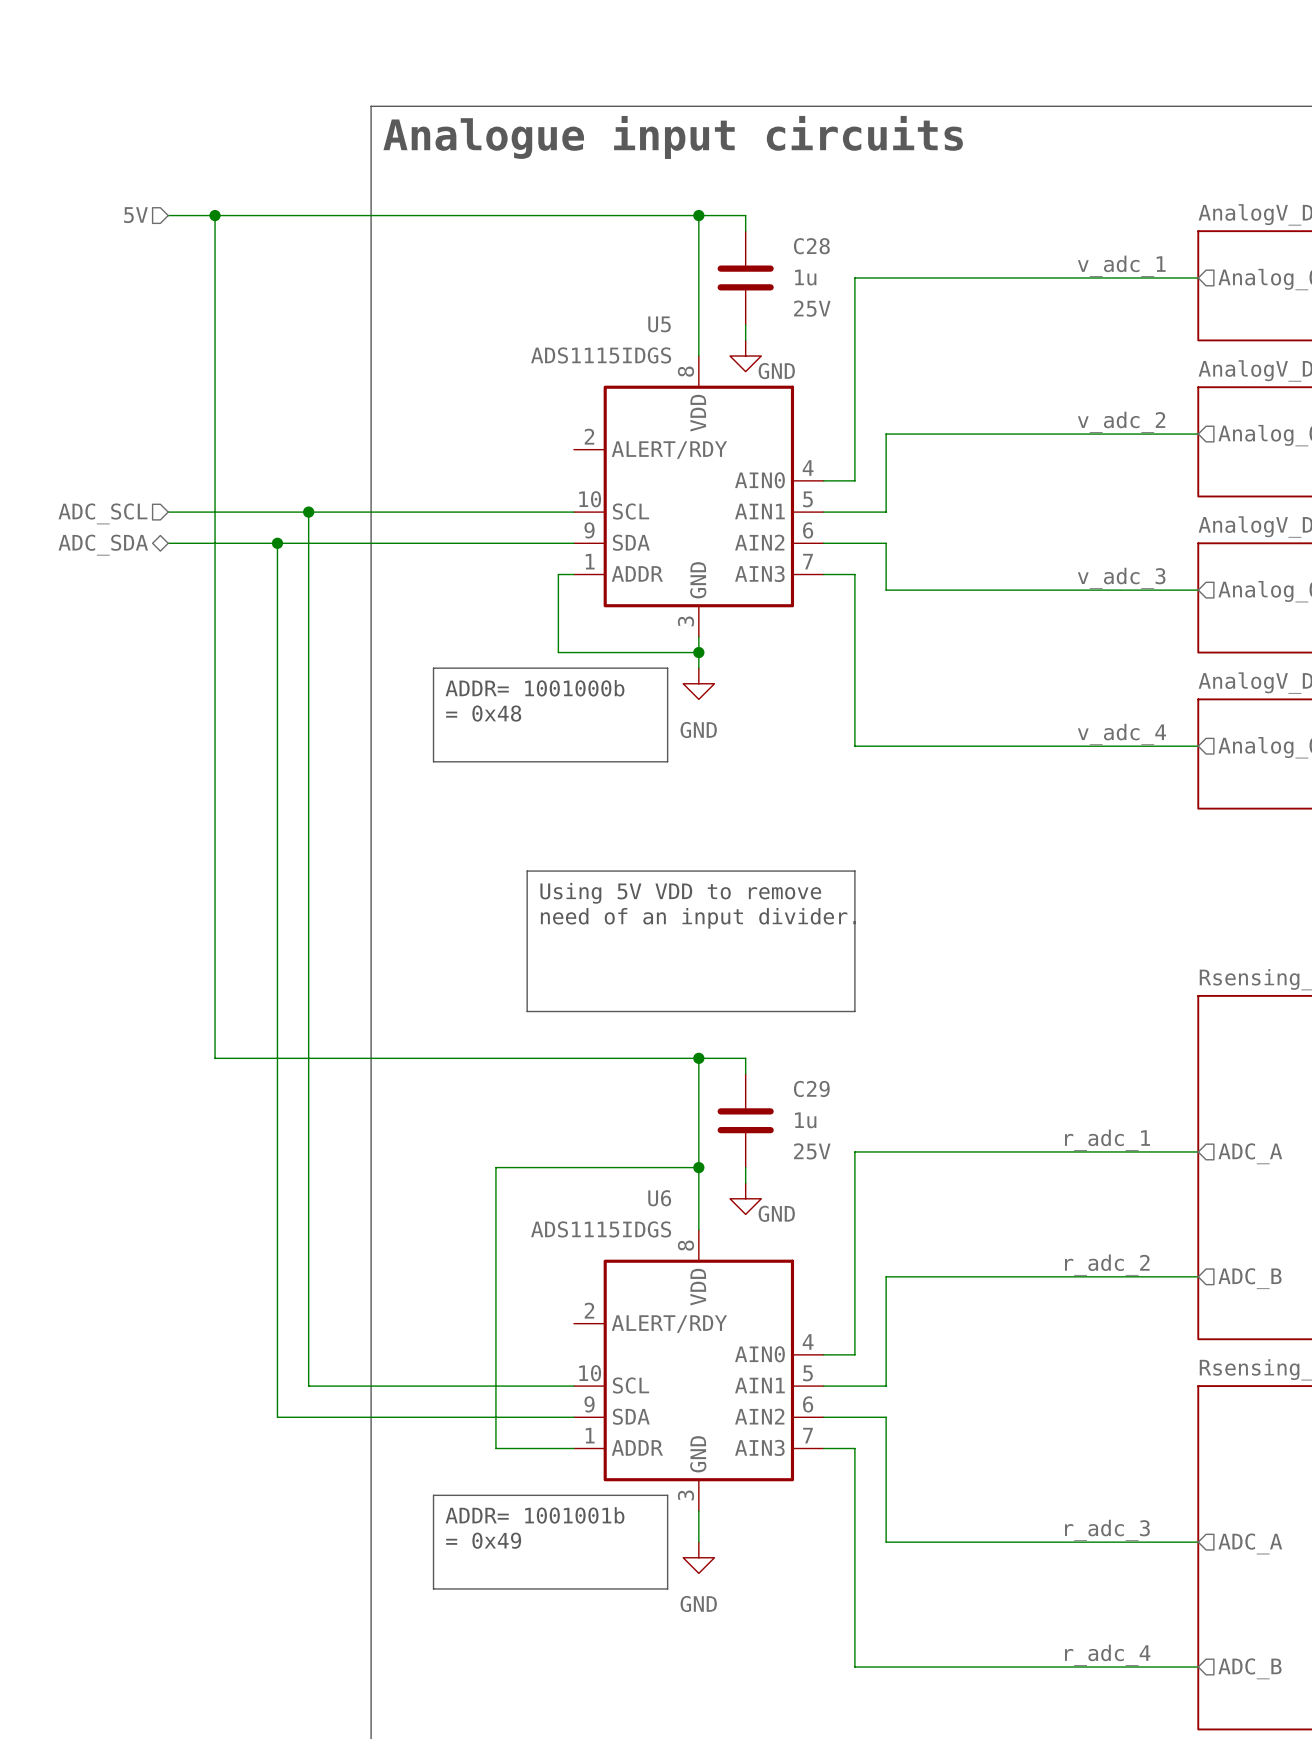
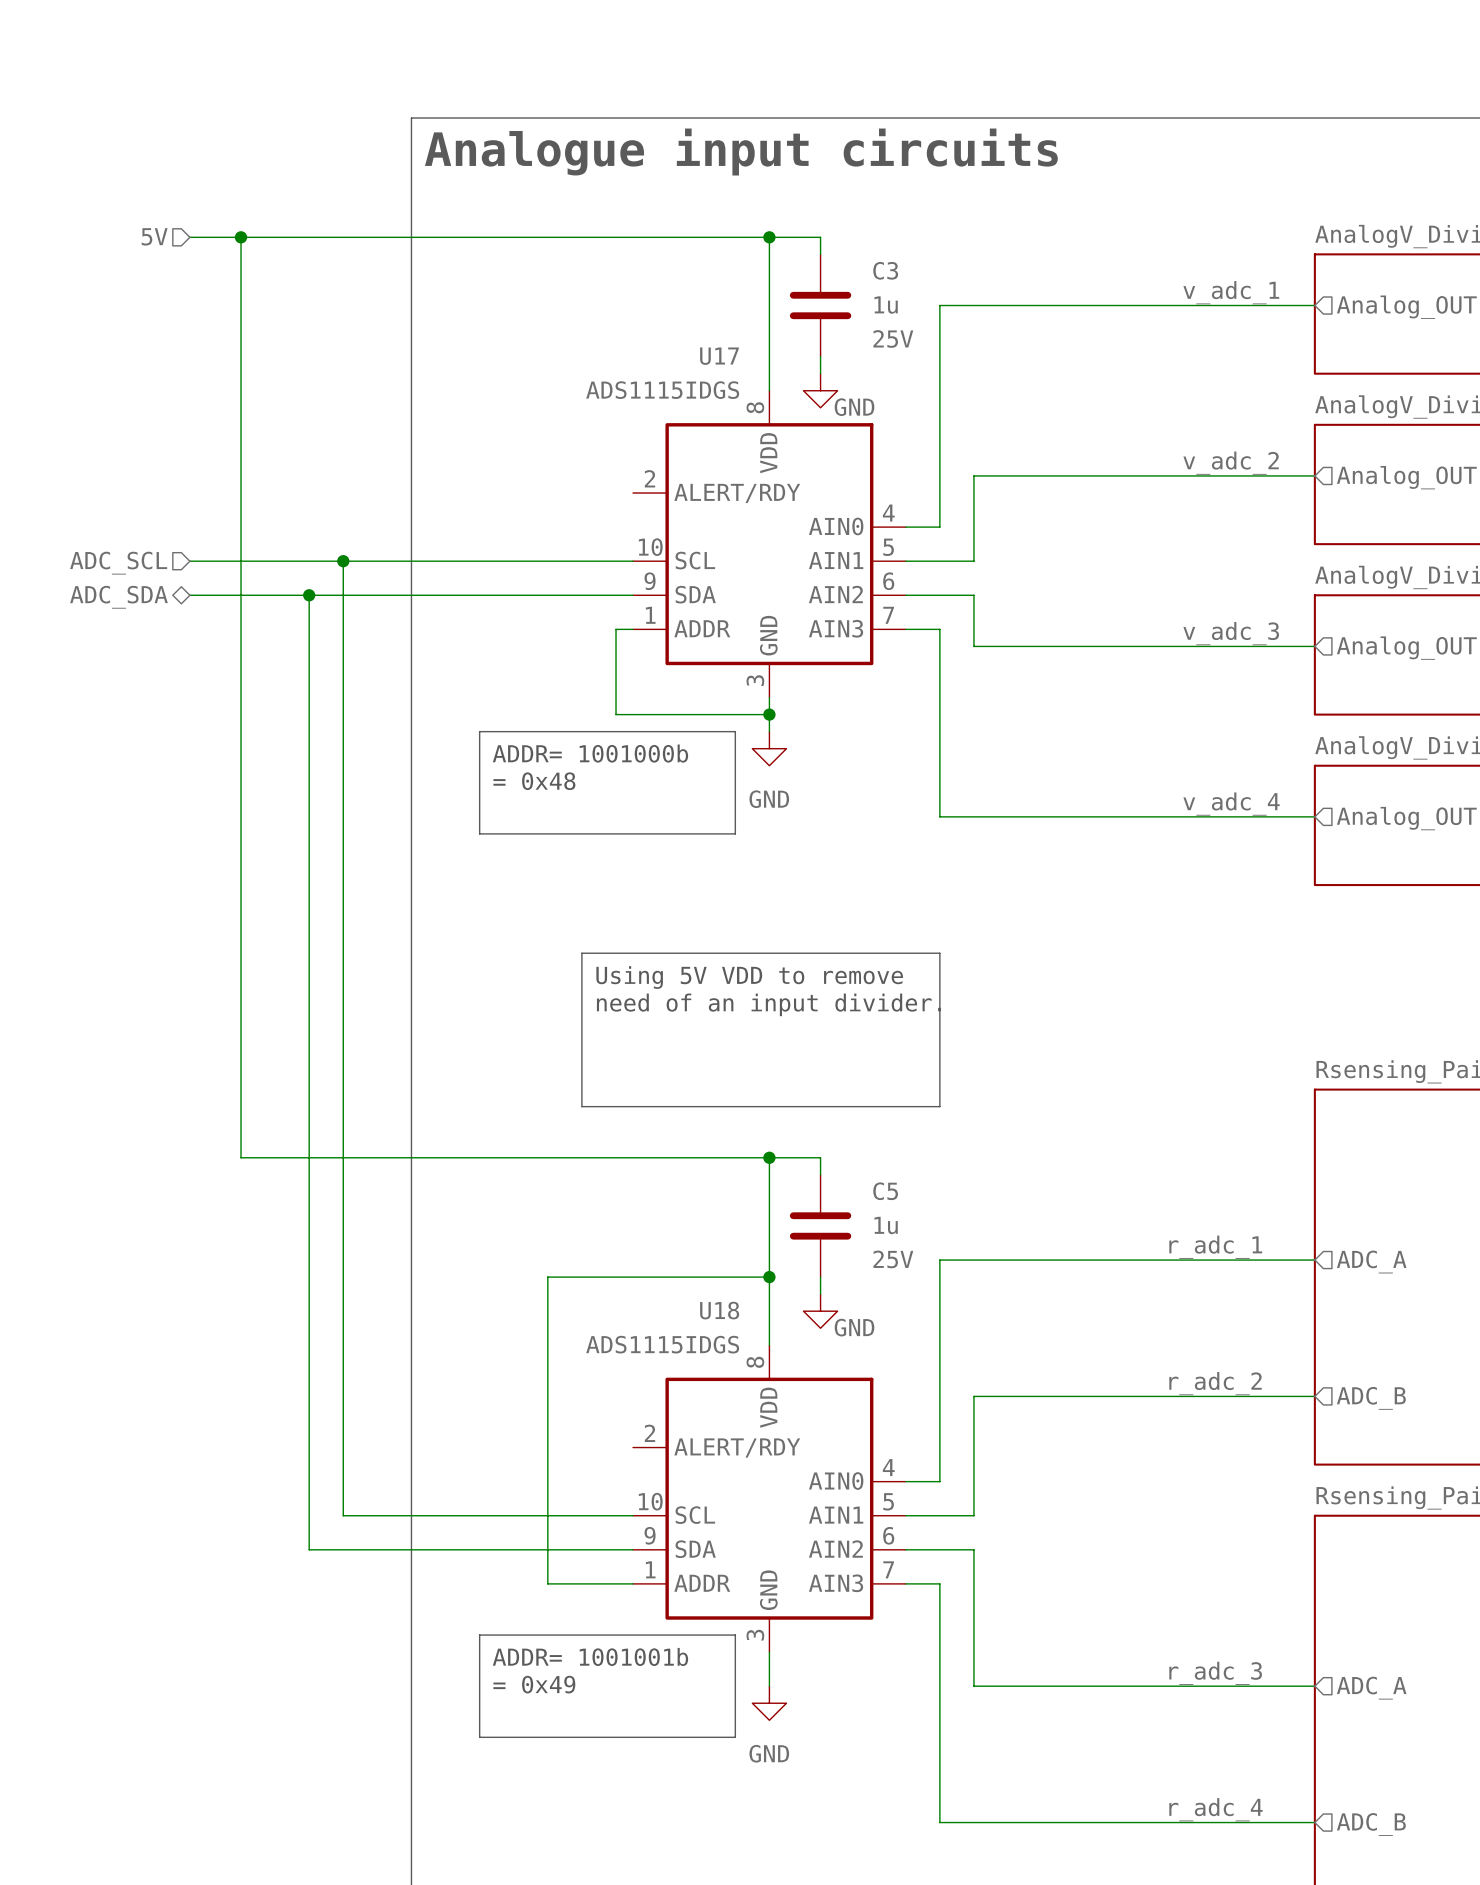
C28 name: C28 (811, 246) -> C3 (885, 270)
U5 name: U5 (659, 324) -> U17 (719, 356)
C29 name: C29 (811, 1088) -> C5 (885, 1191)
U6 name: U6 (659, 1198) -> U18 (719, 1310)

